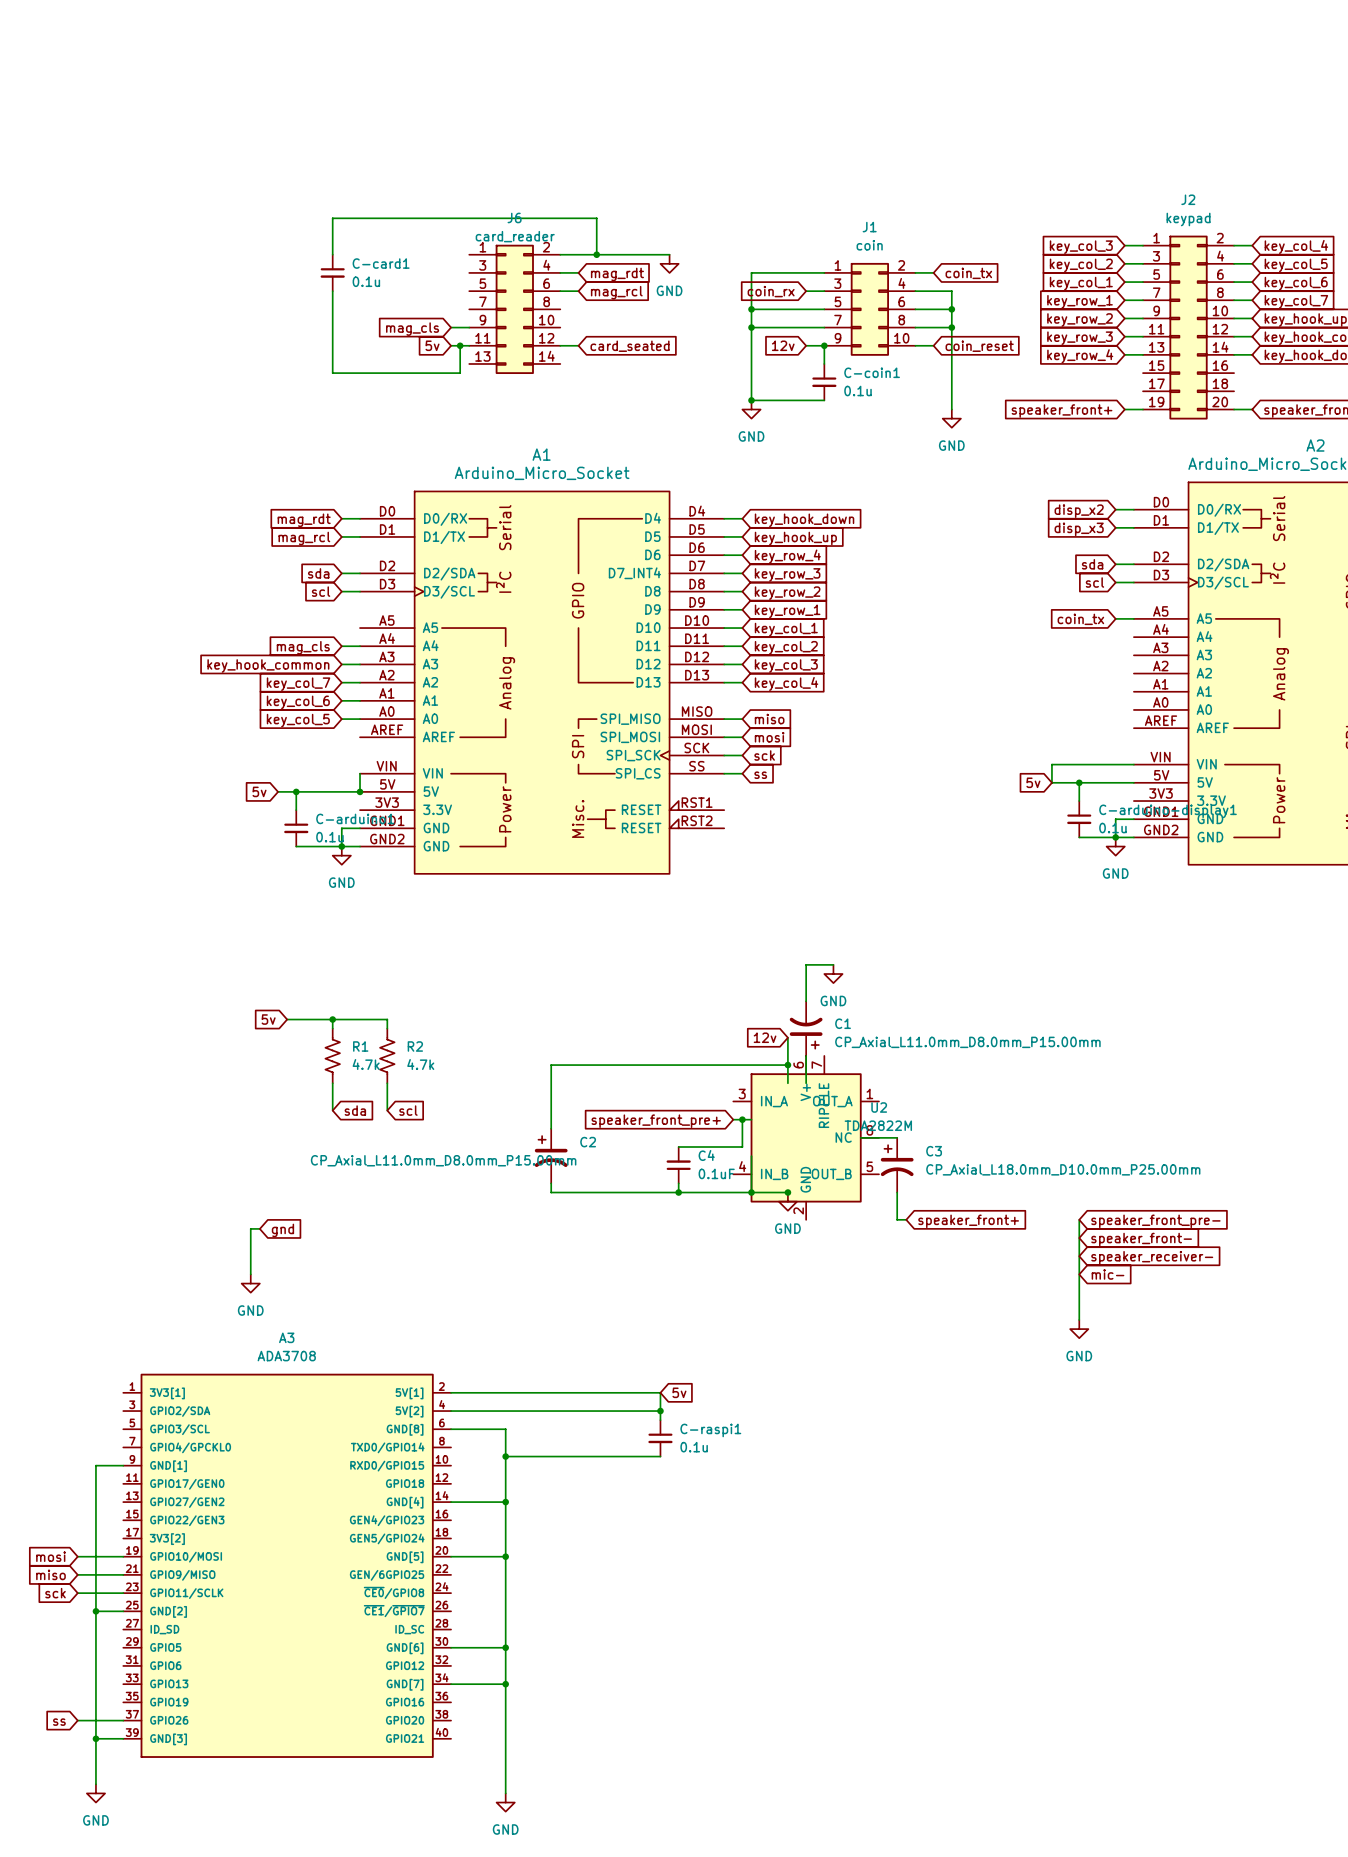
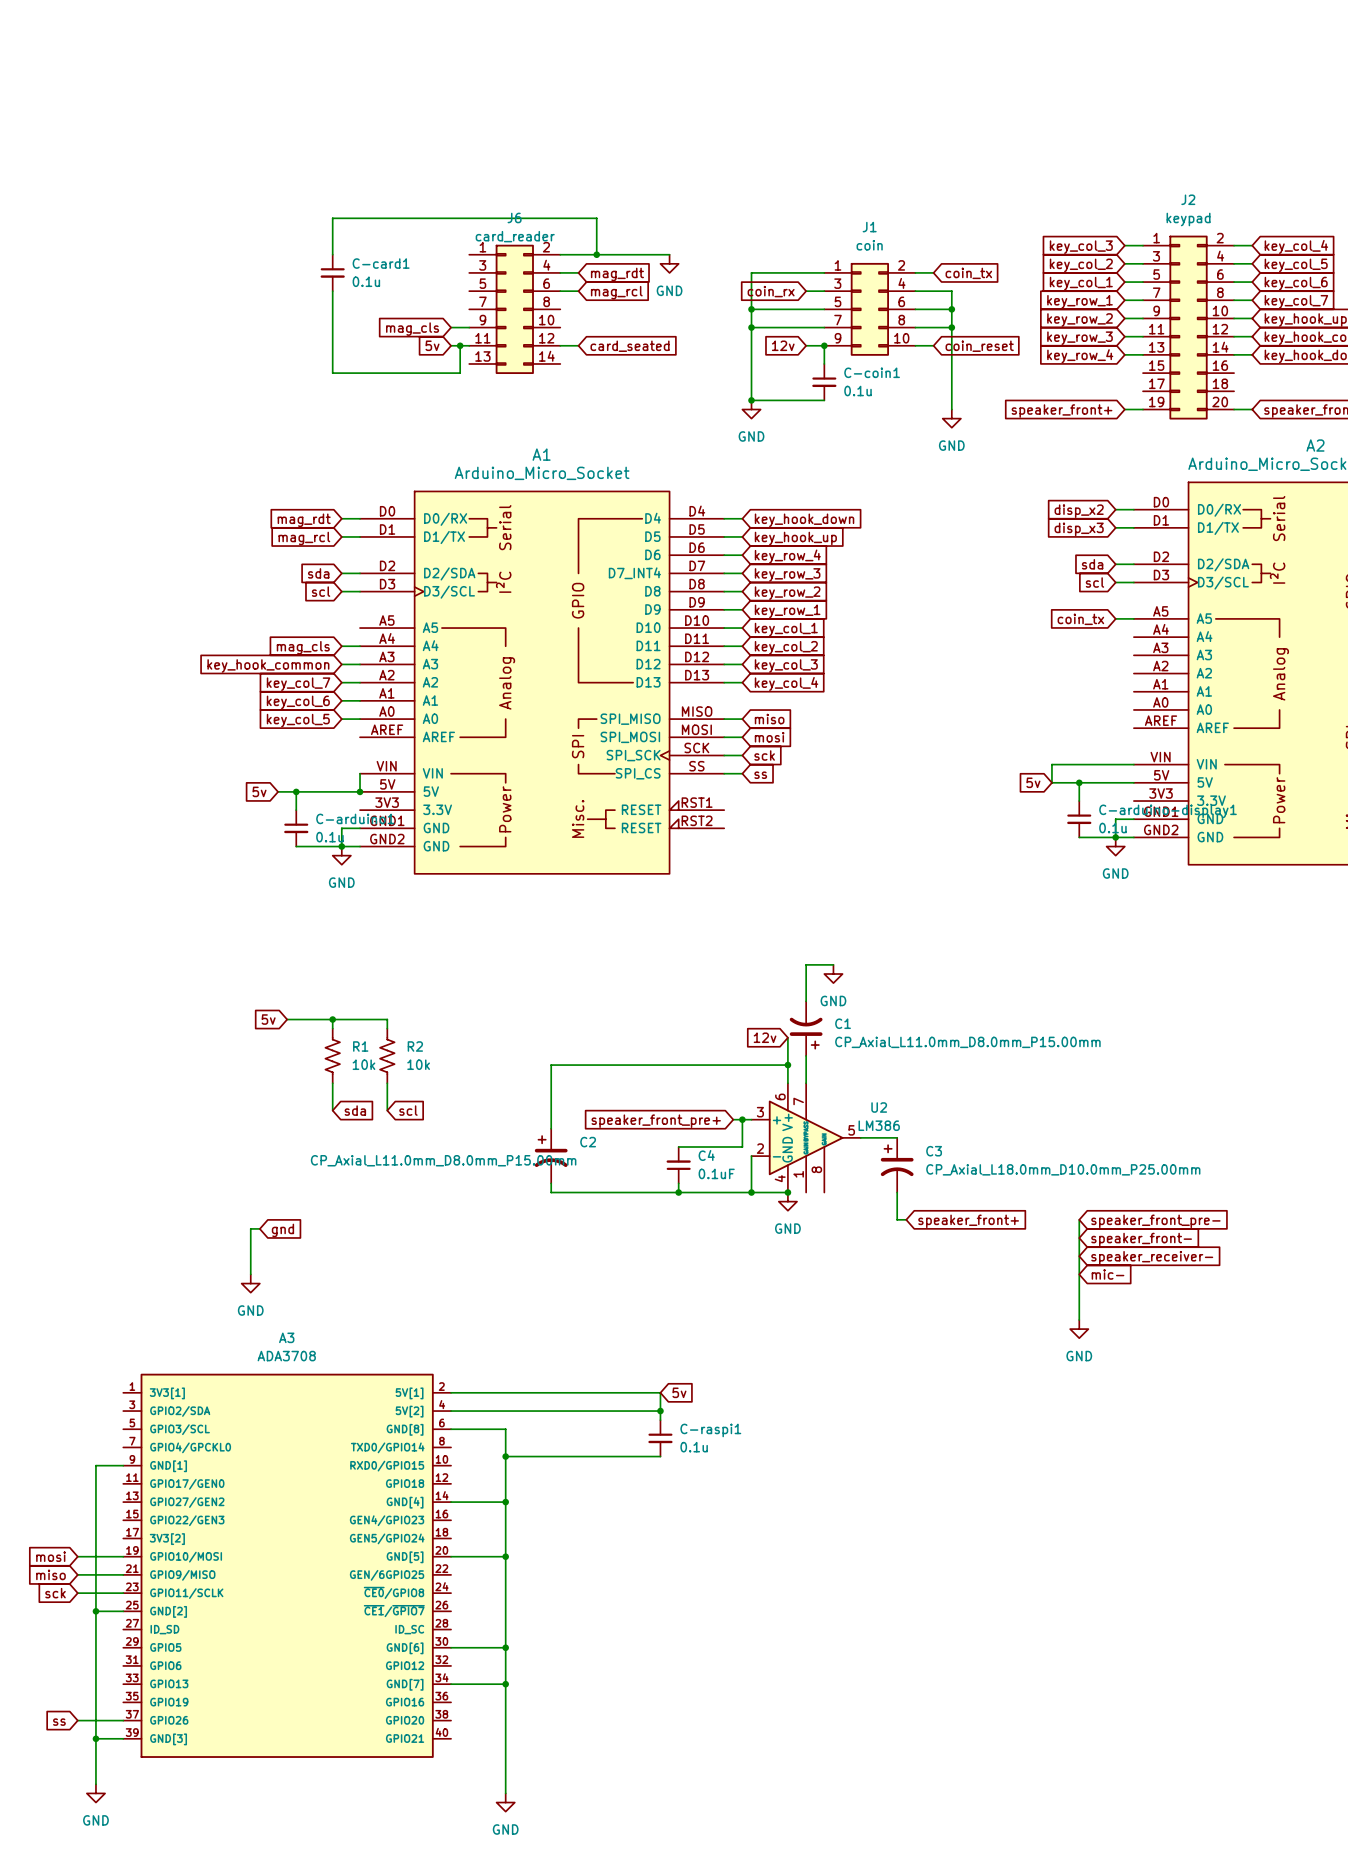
U2 symbol: [733, 1055, 879, 1220] -> [751, 1083, 861, 1193]
R1 value: 4.7k (366, 1064) -> 10k (363, 1064)
R2 value: 4.7k (420, 1064) -> 10k (418, 1064)
U2 value: TDA2822M (878, 1125) -> LM386 (879, 1125)

